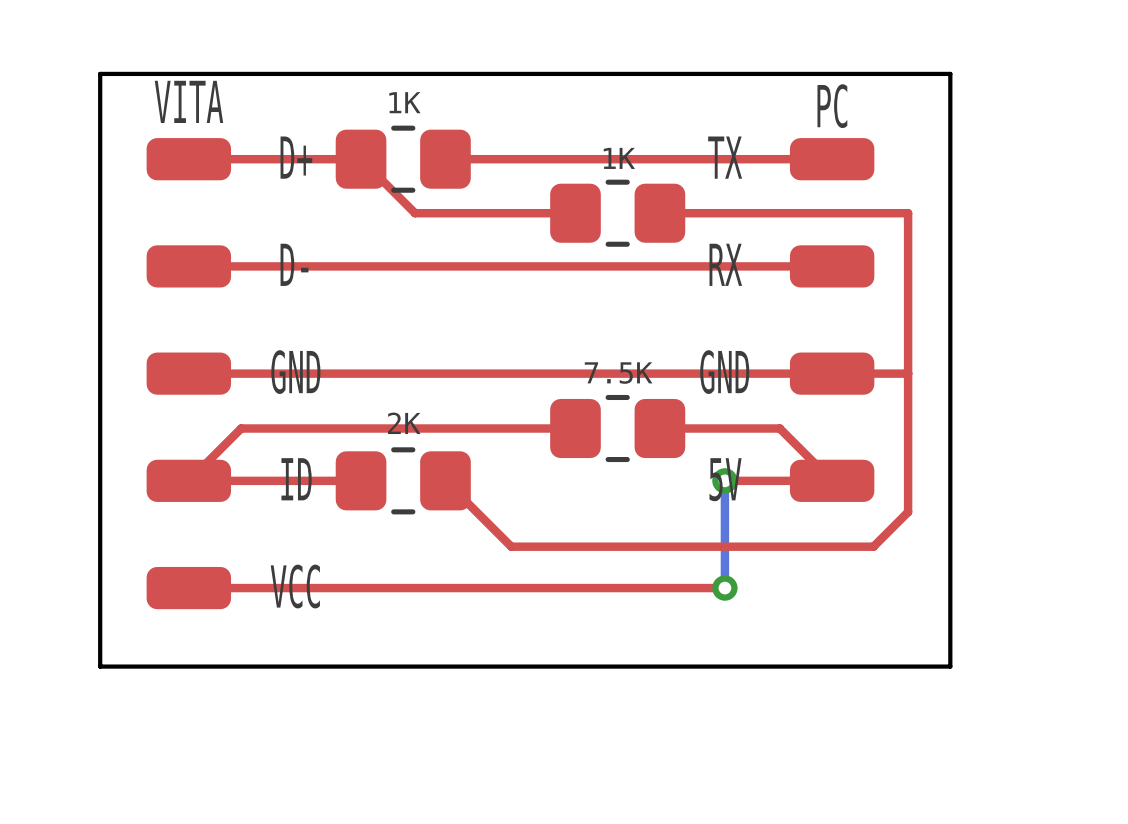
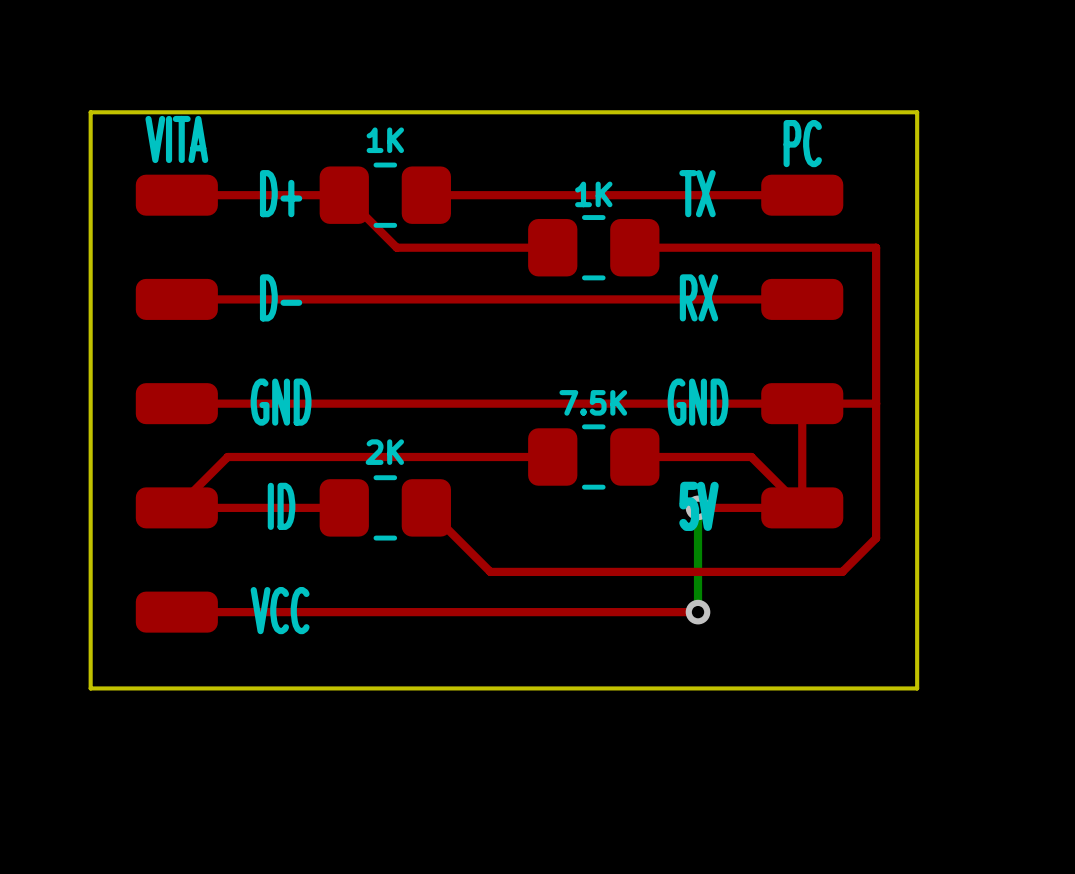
top track: none -> (802, 403) (802, 507)

